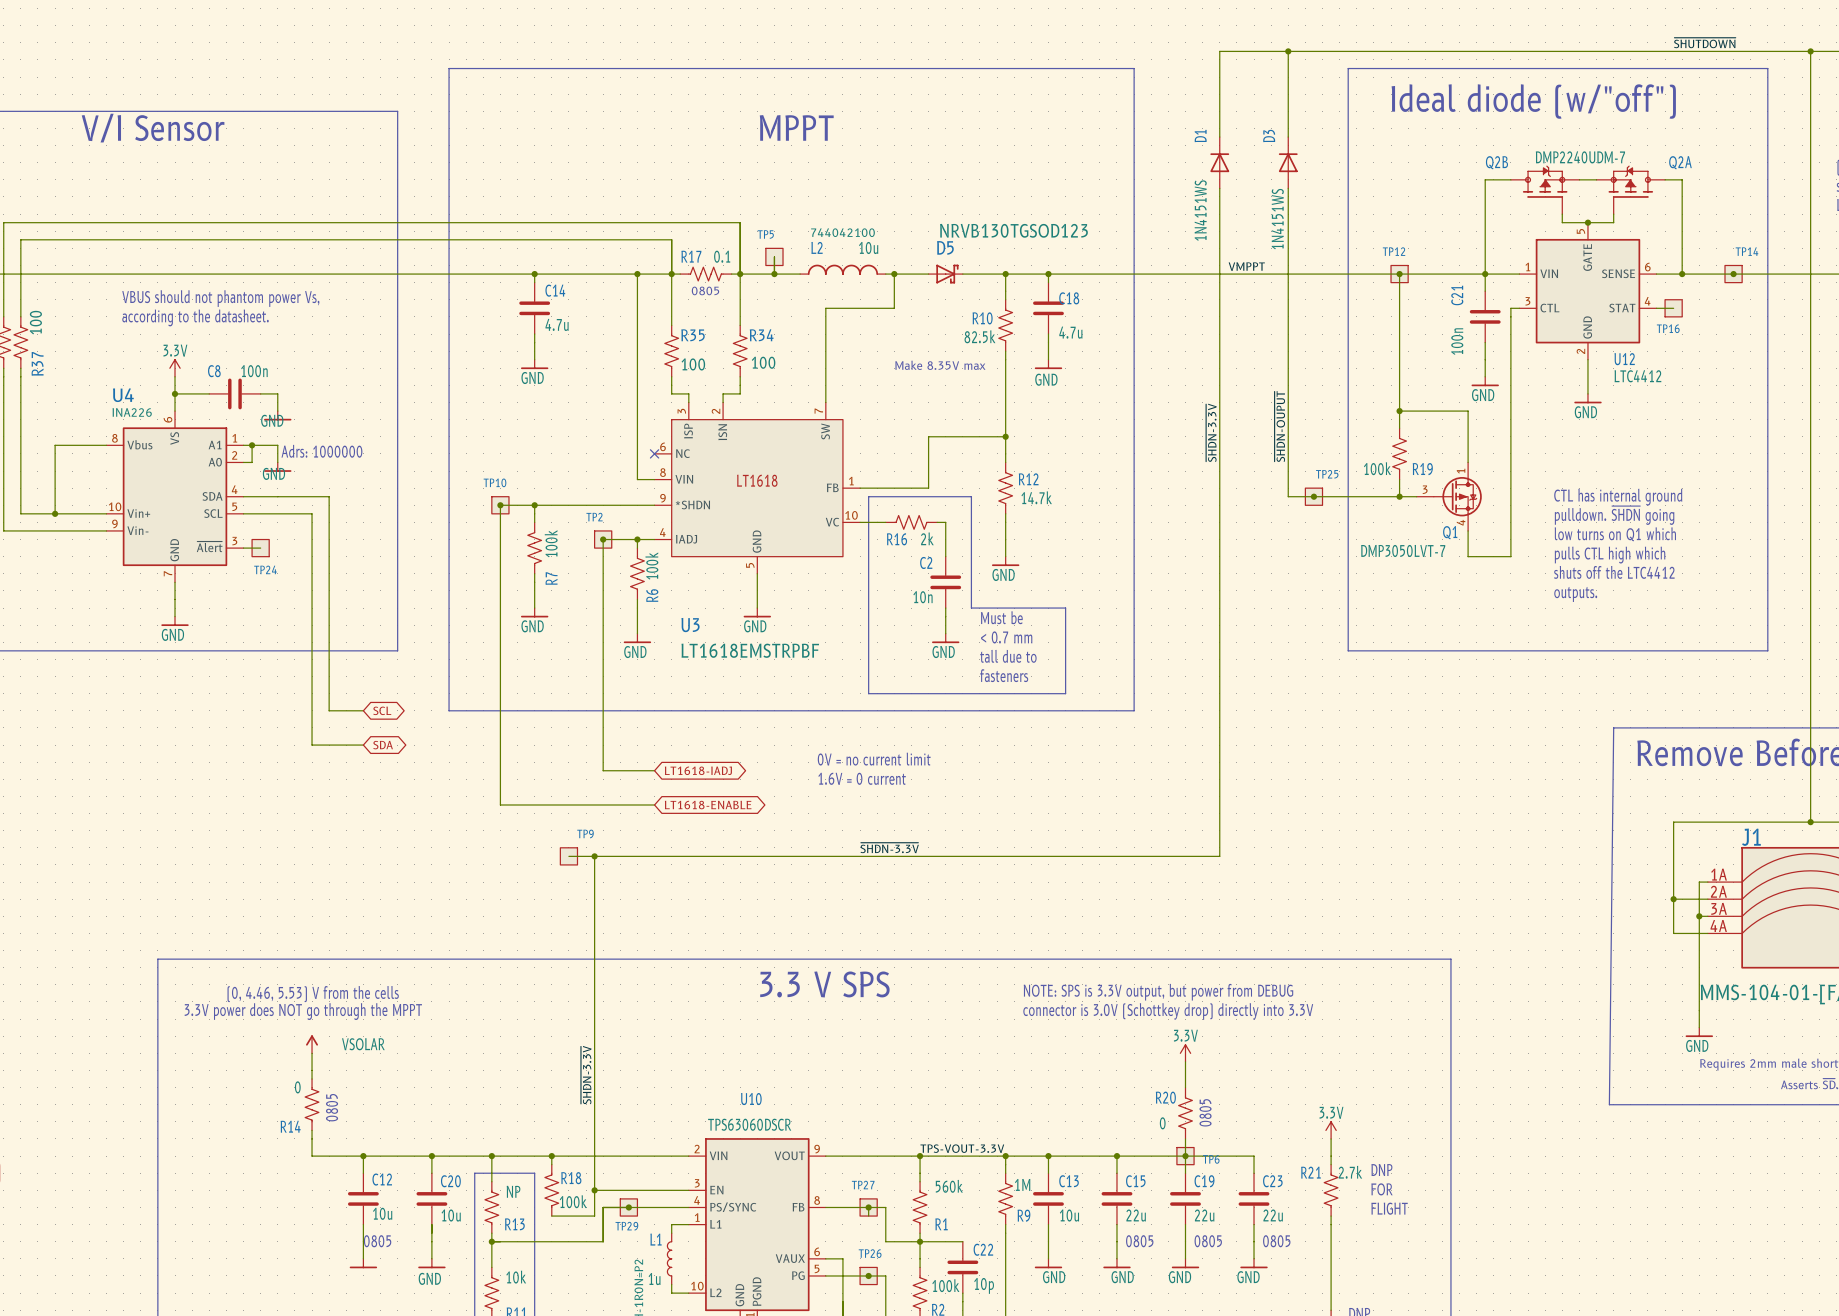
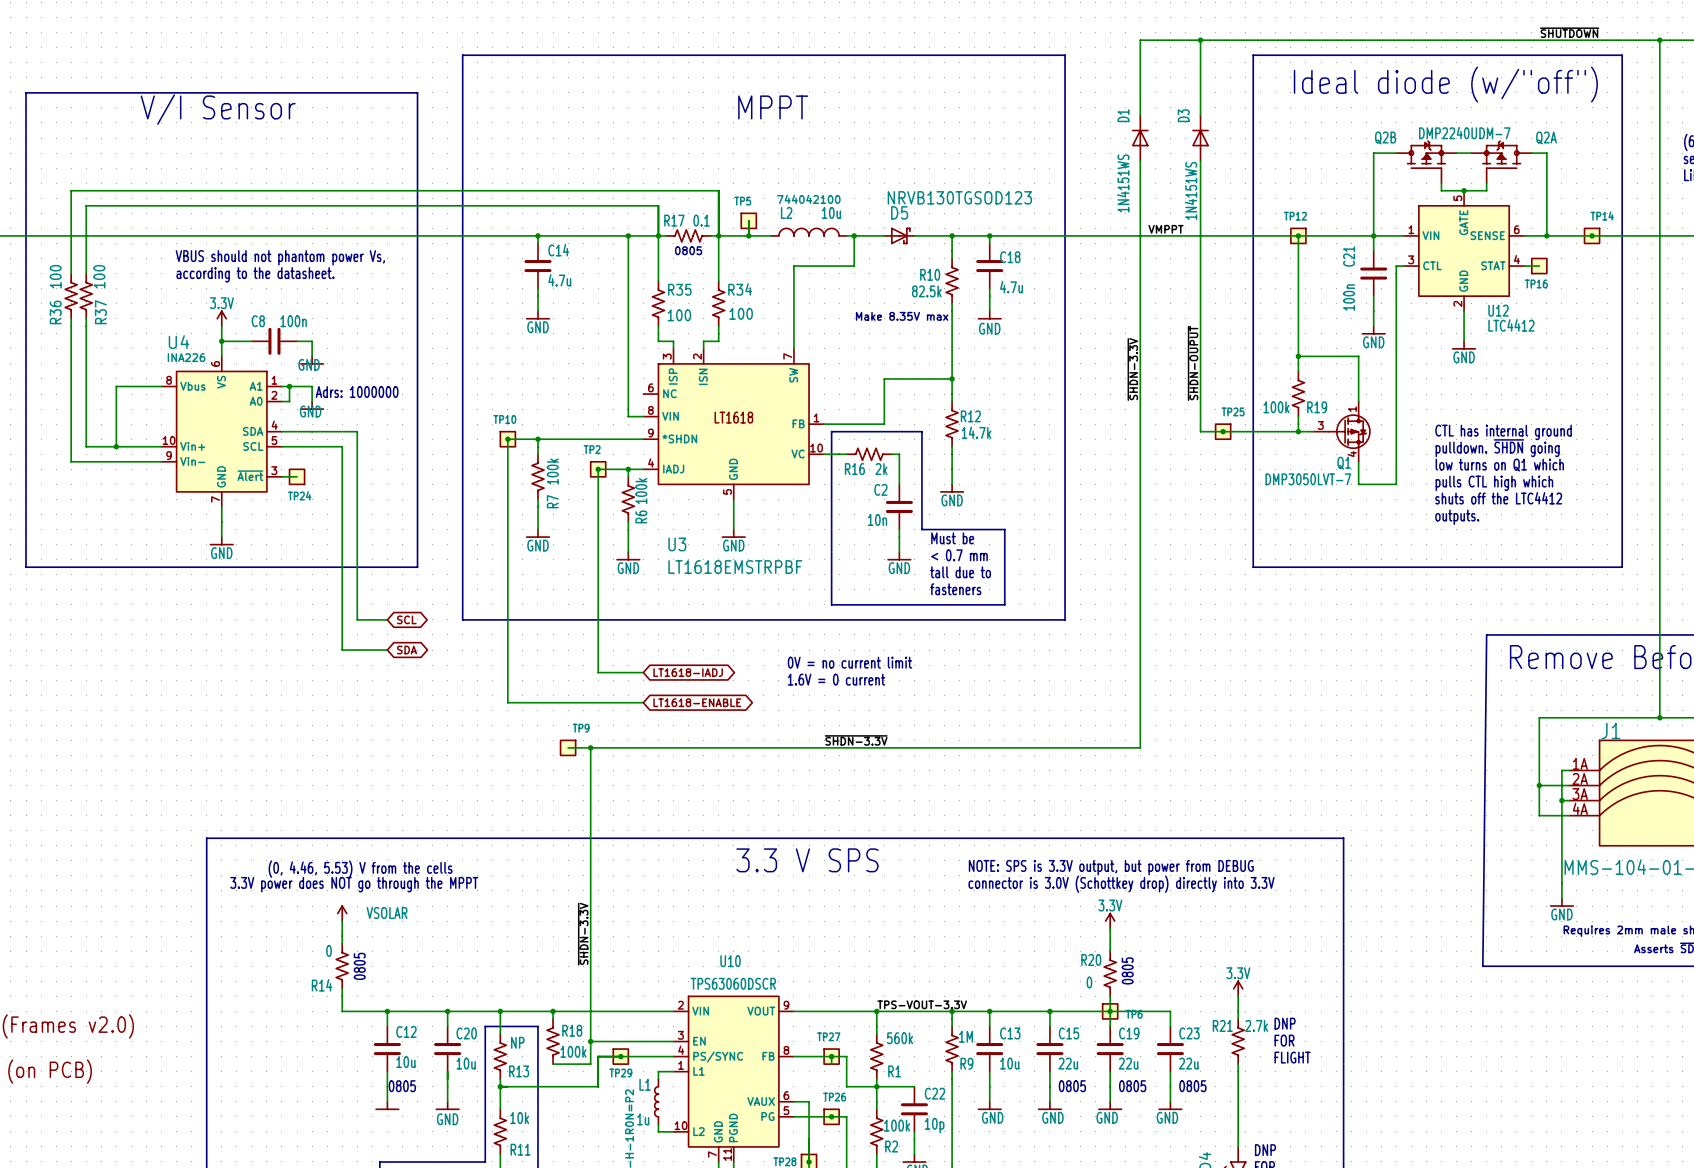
no-connect mark: (654, 453) -> none

